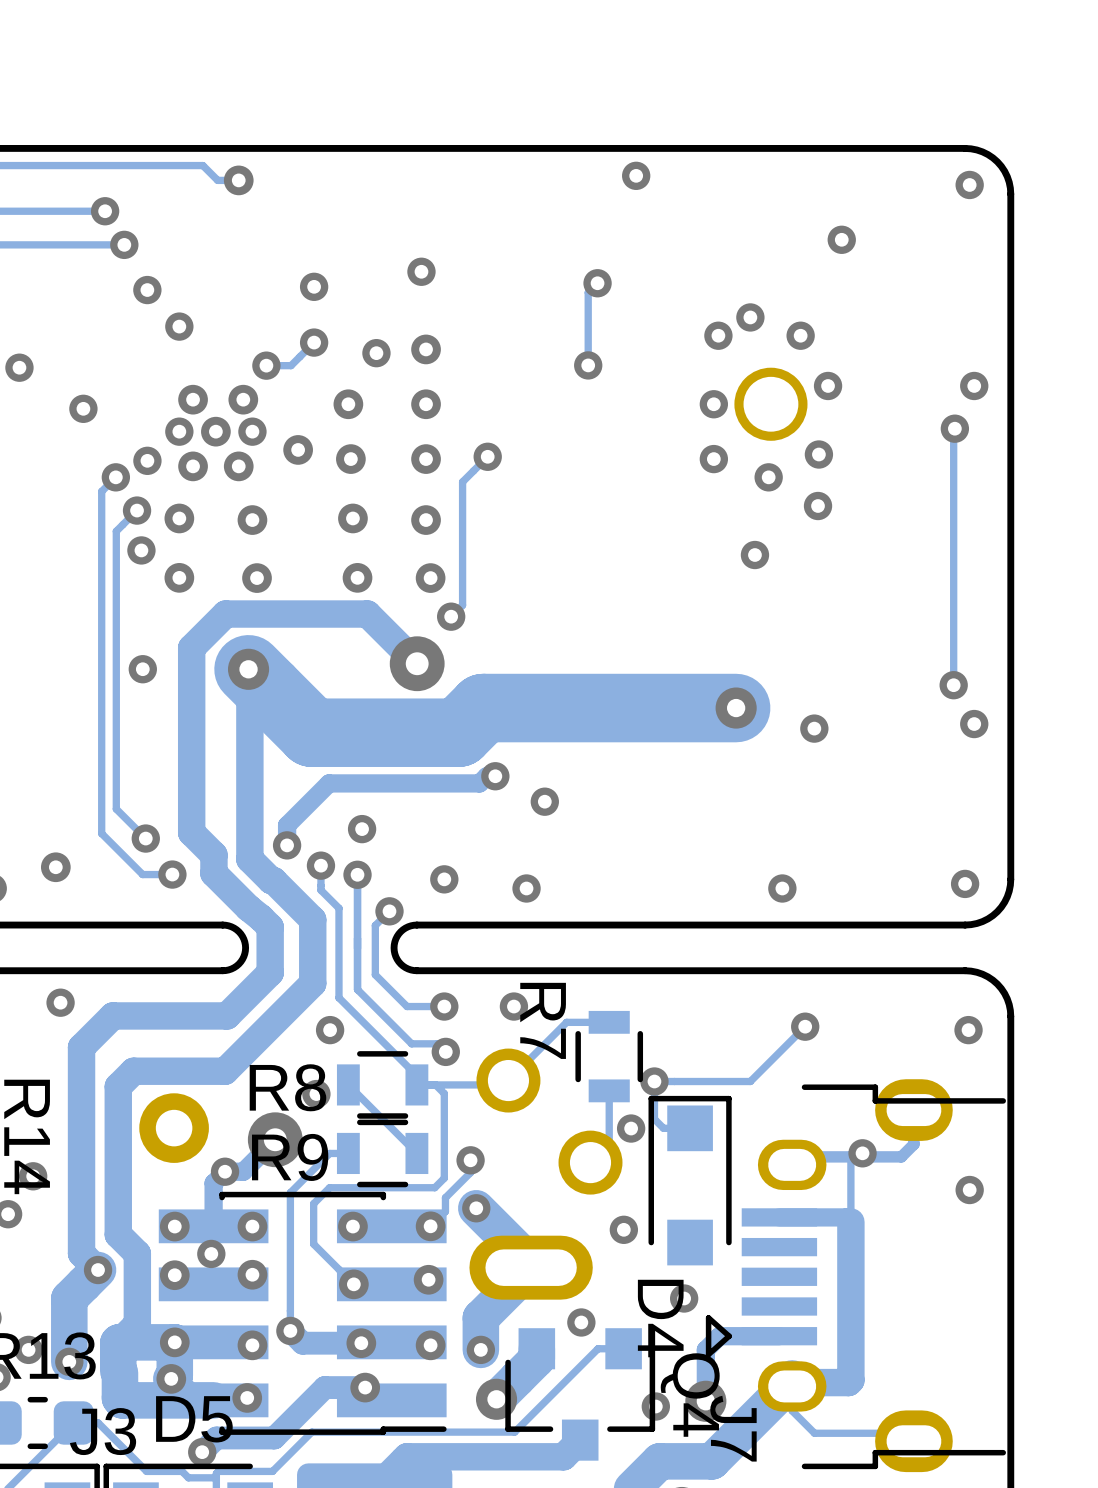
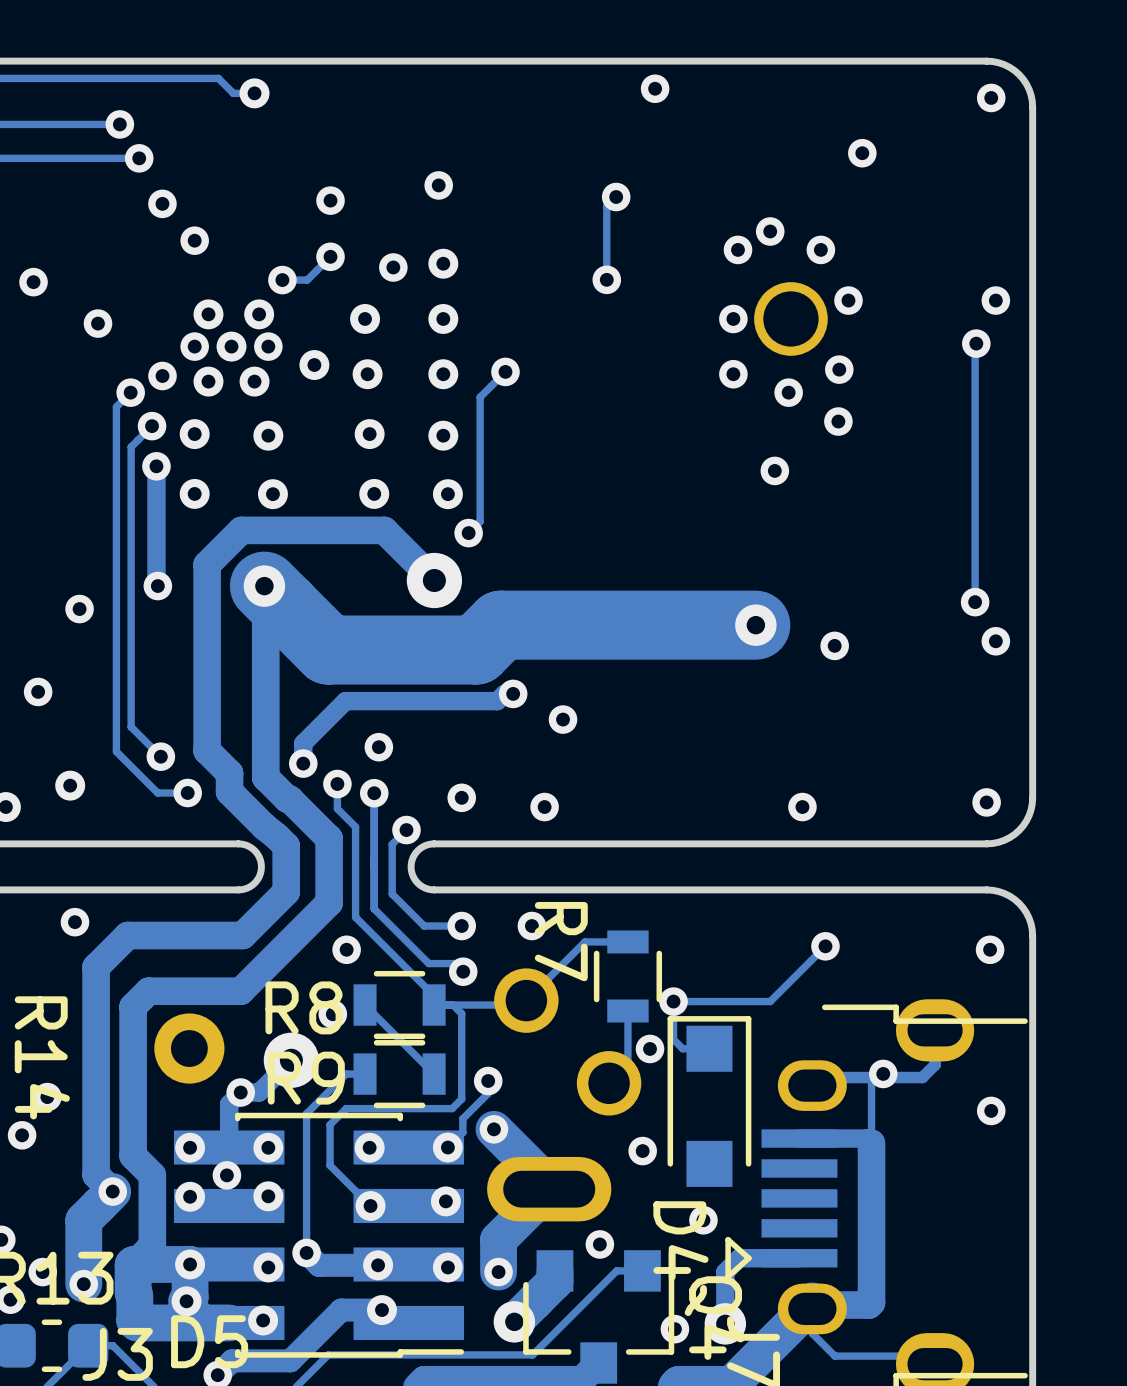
track: none -> (156, 466) (157, 586)
via: none -> (79, 609)
via: none -> (38, 691)

